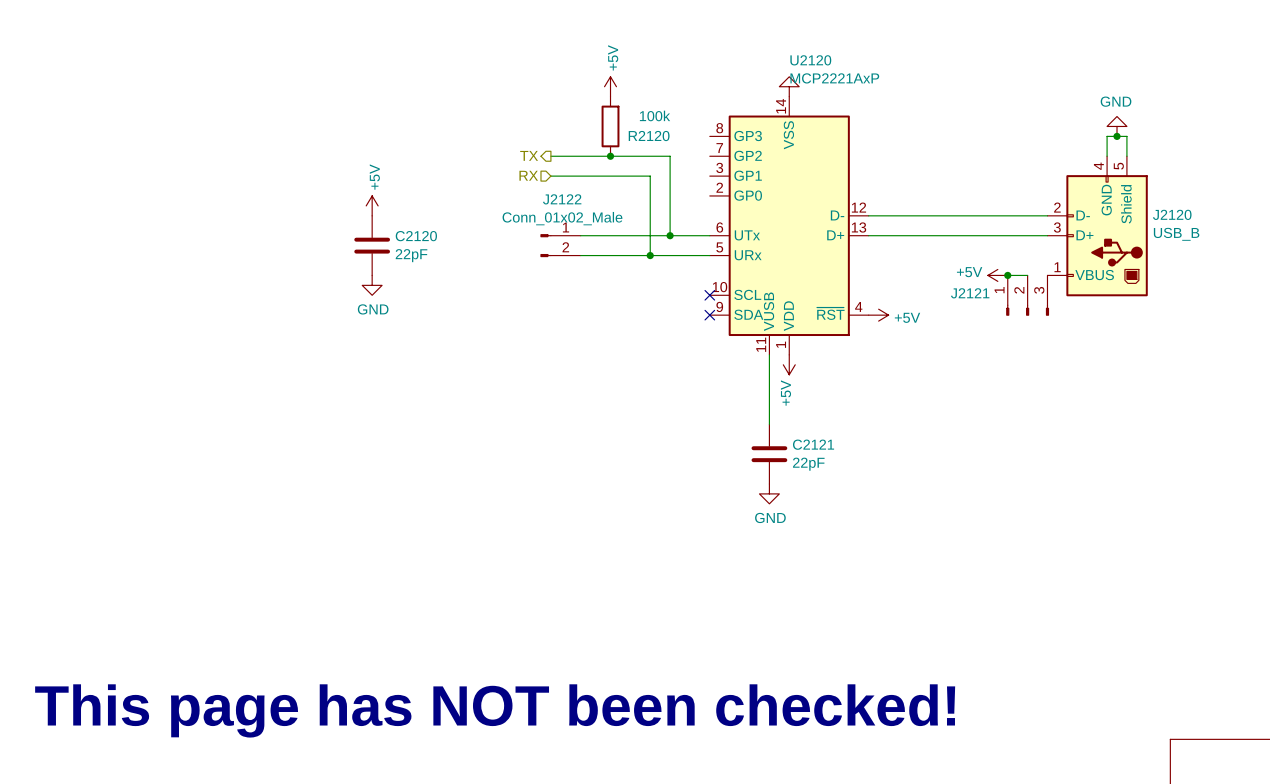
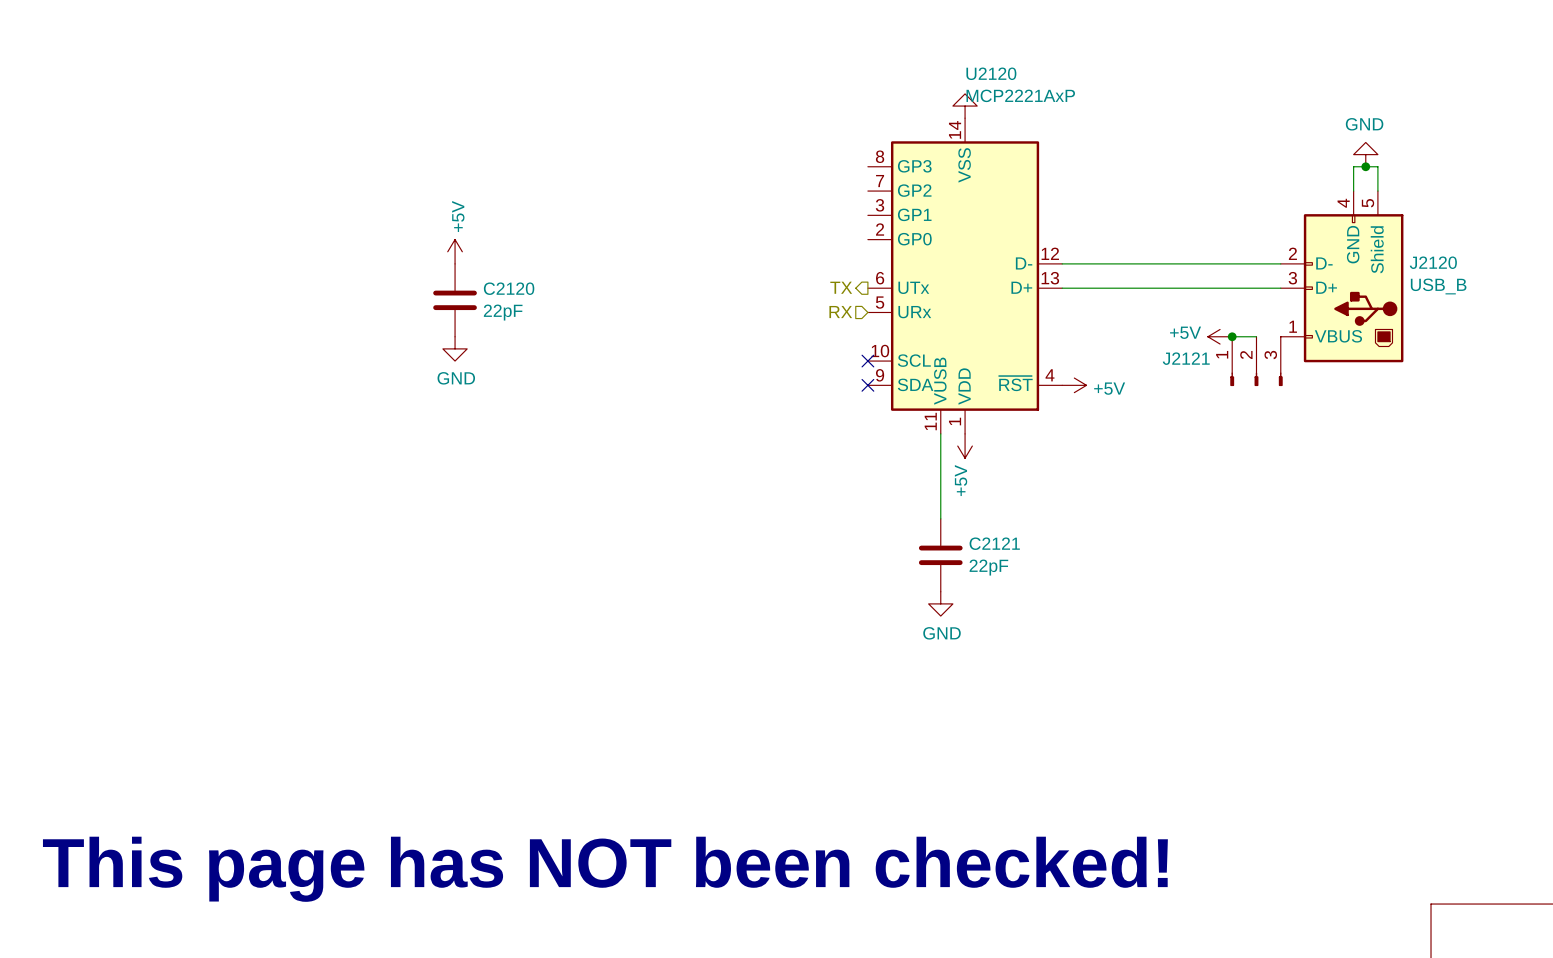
power symbol: +5V (610, 86) -> none
R2120: 100k (610, 126) -> none
hierarchical label position: TX (529, 155) -> TX (841, 287)
wire: (550, 156) (670, 156) (670, 235) -> none
junction: (610, 156) -> none
hierarchical label position: RX (528, 175) -> RX (840, 312)
wire: (550, 176) (650, 176) (650, 255) -> none
wire: (580, 235) (709, 235) -> none
junction: (670, 235) -> none
J2122: Conn_01x02_Male (560, 245) -> none
wire: (580, 255) (709, 255) -> none
junction: (650, 255) -> none

